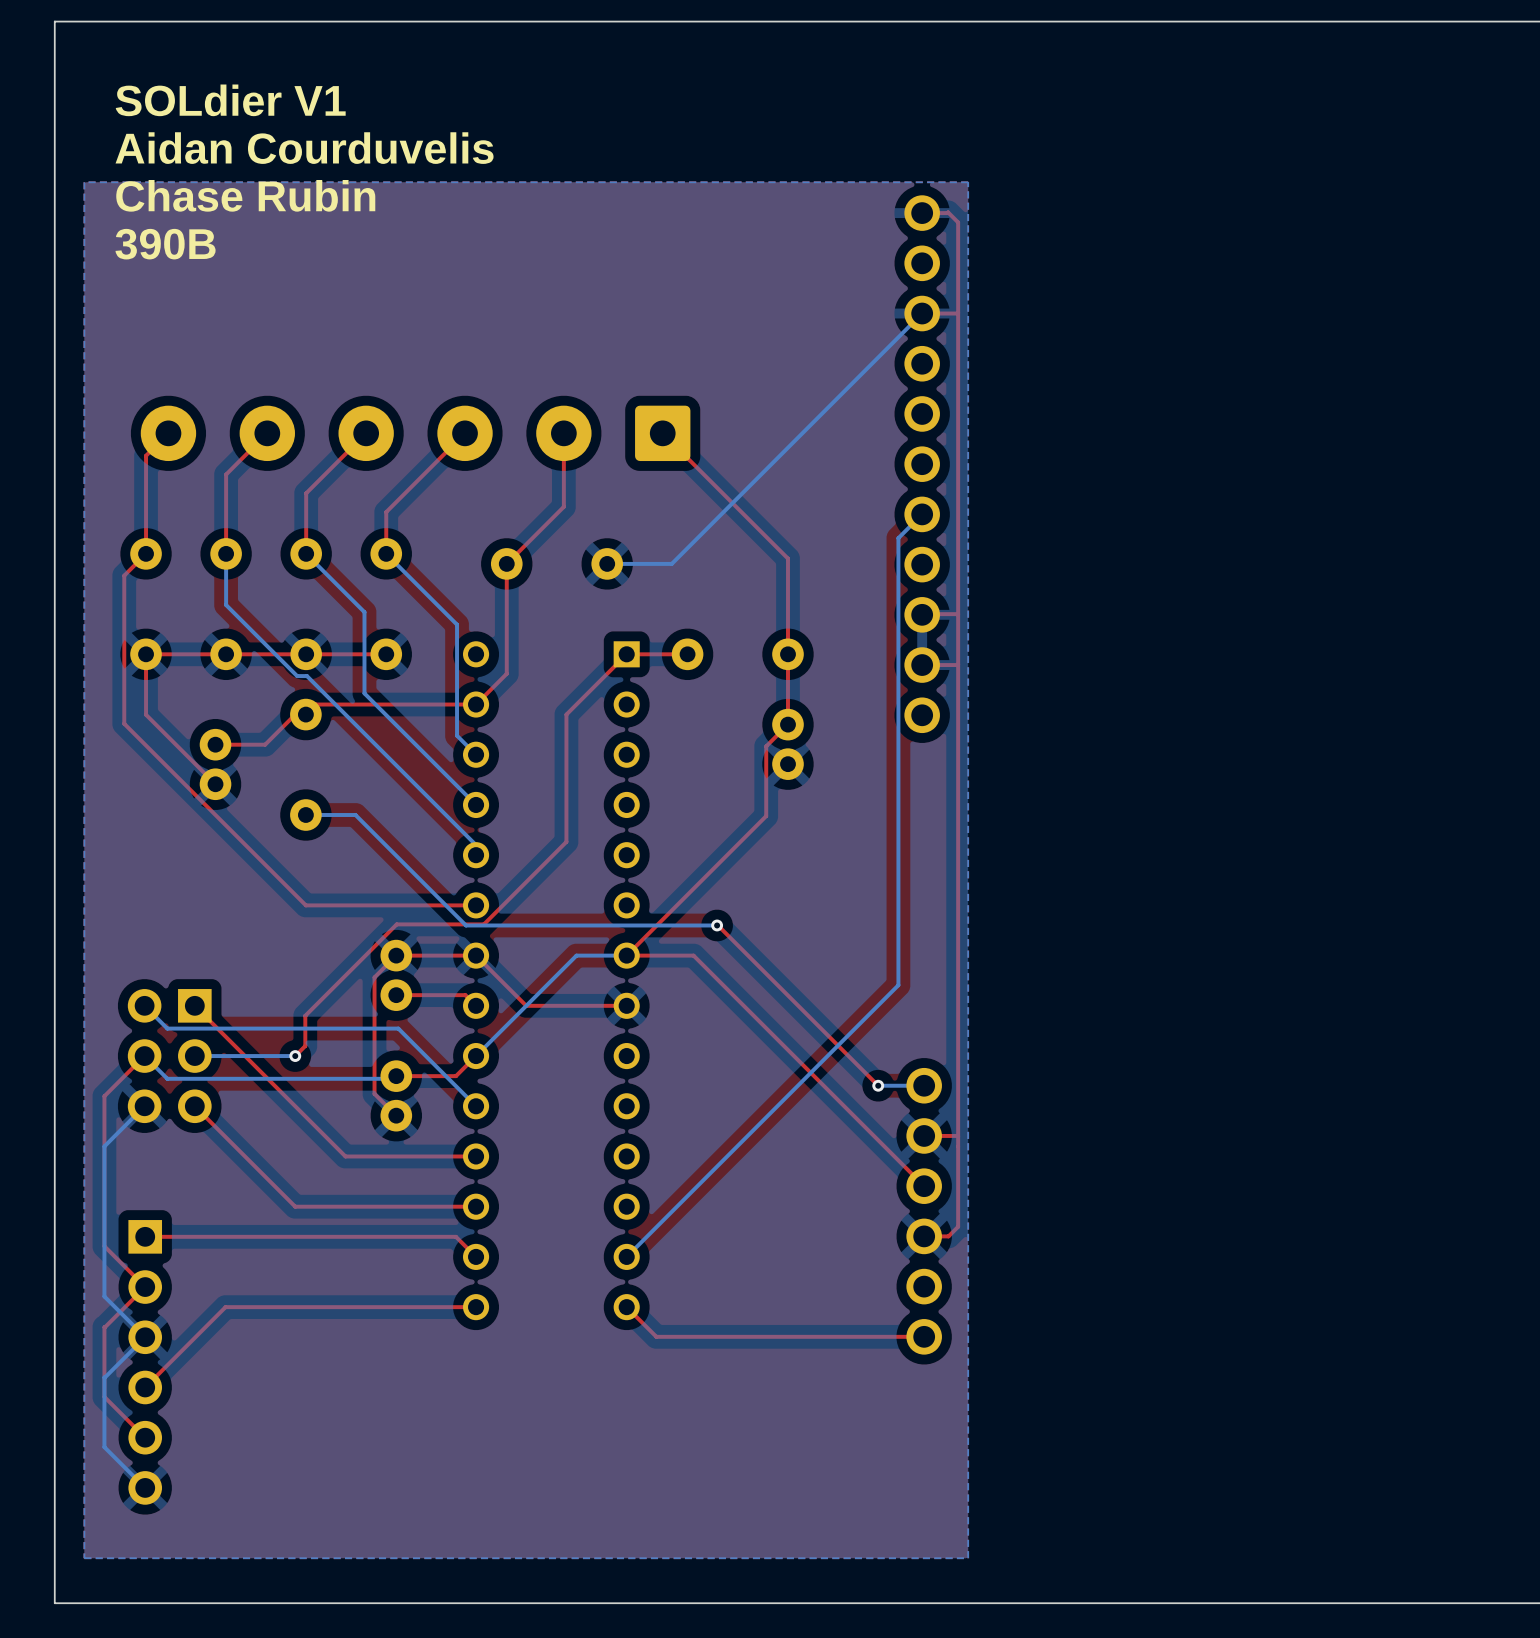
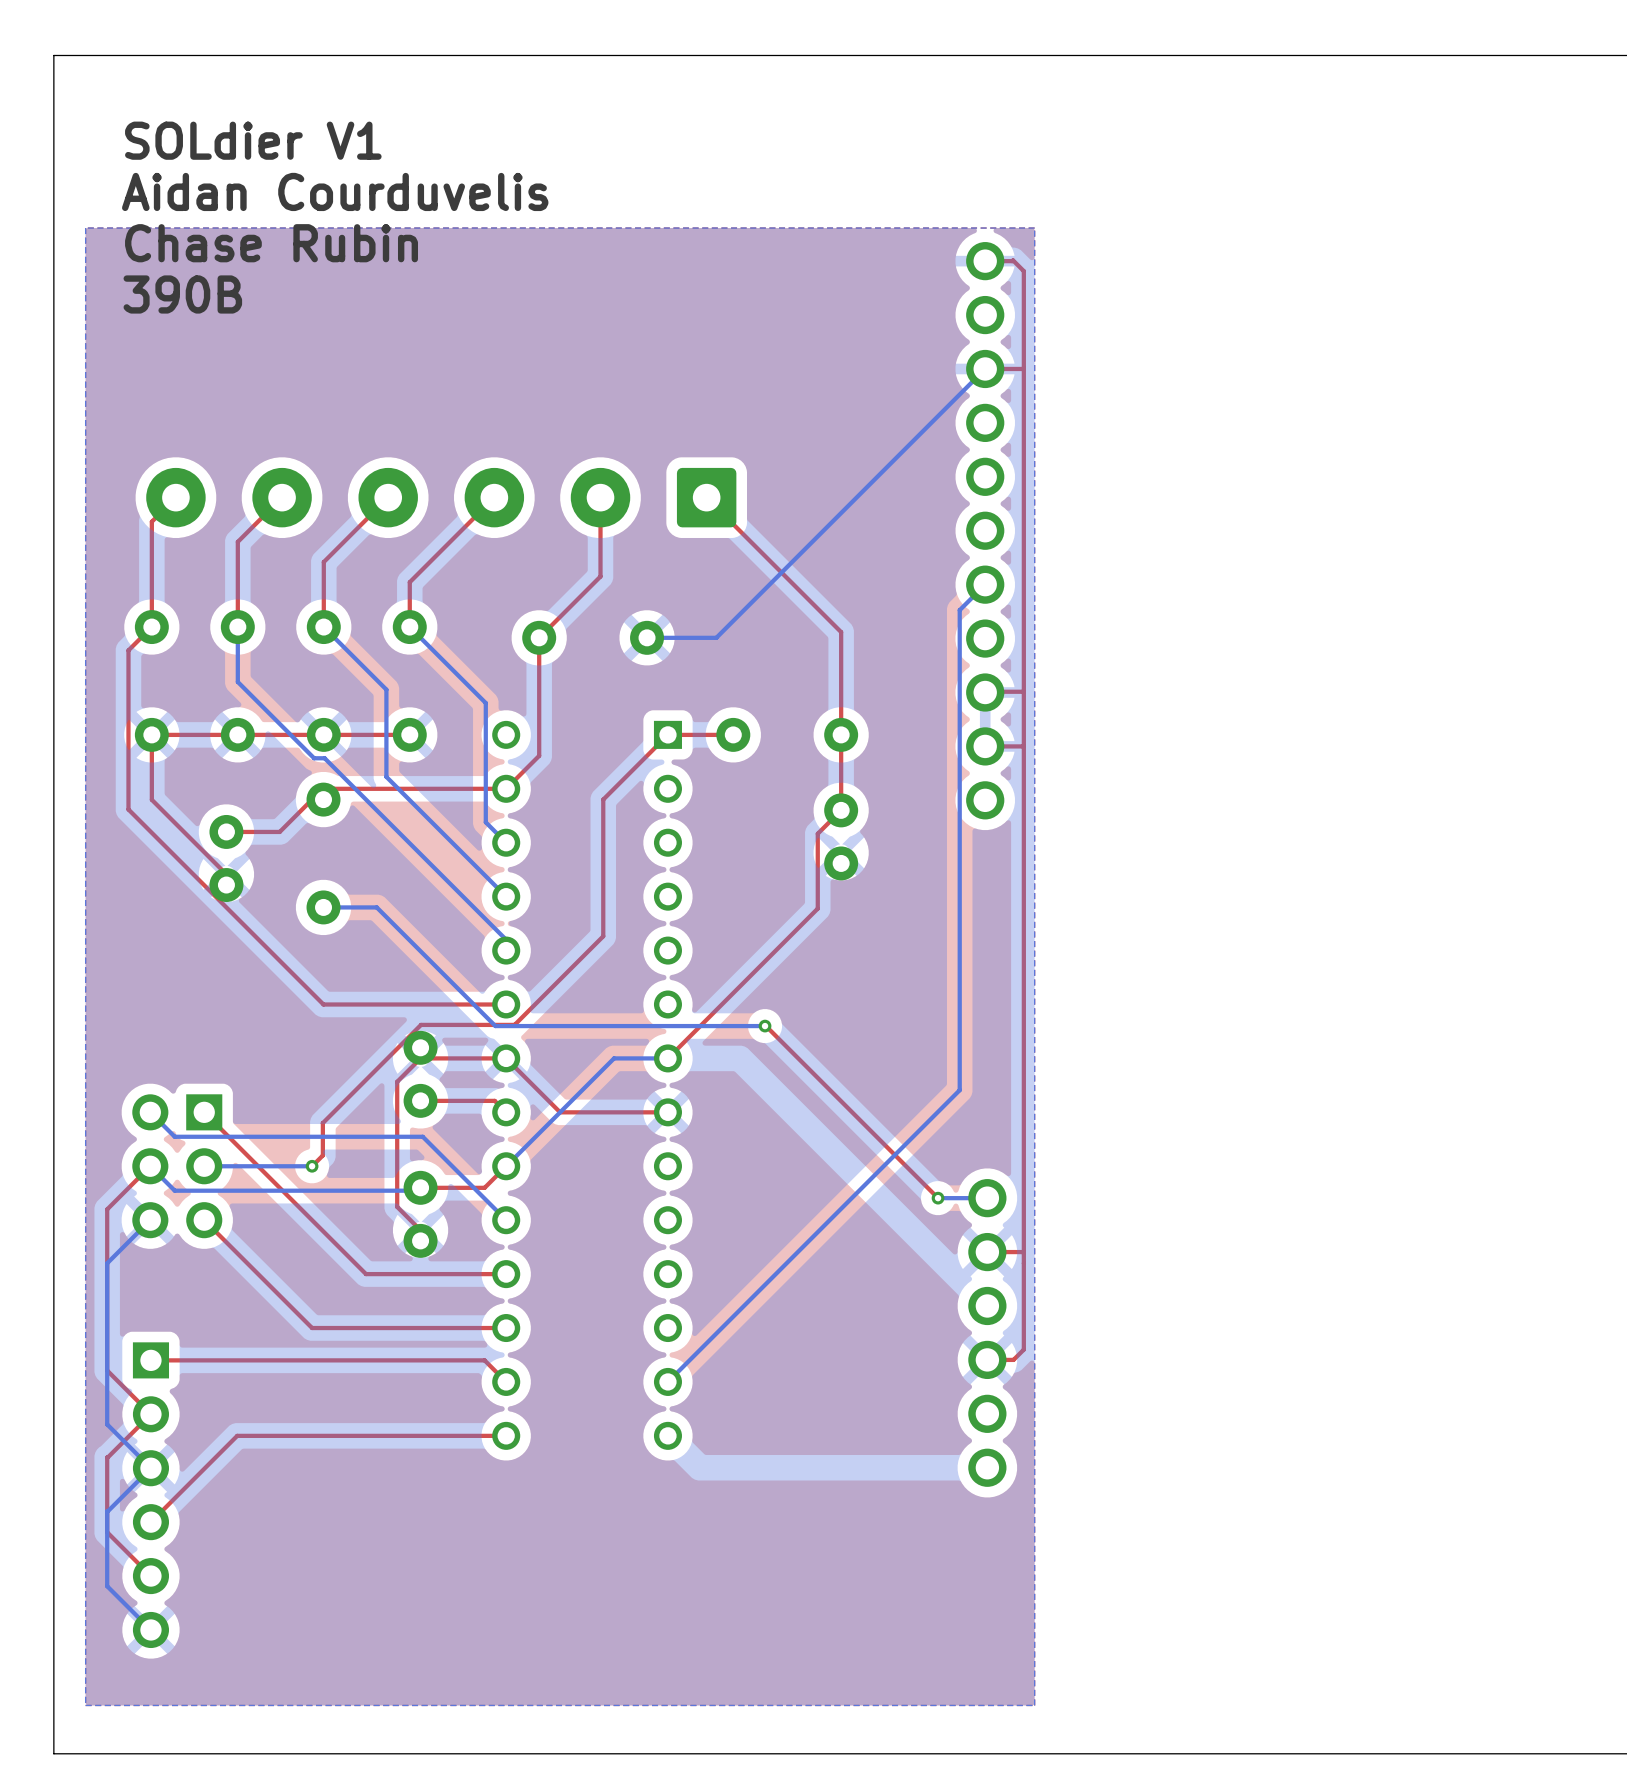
part footprint: [772, 708, 804, 780] -> [824, 793, 859, 881]
part footprint: [199, 728, 232, 801] -> [209, 814, 244, 903]
part footprint: [380, 939, 413, 1011] -> [403, 1030, 438, 1118]
top track: (626, 955) (693, 955) (924, 1186) -> none
part footprint: [380, 1060, 413, 1132] -> [403, 1170, 438, 1258]
top track: (626, 1307) (656, 1336) (924, 1336) -> none

